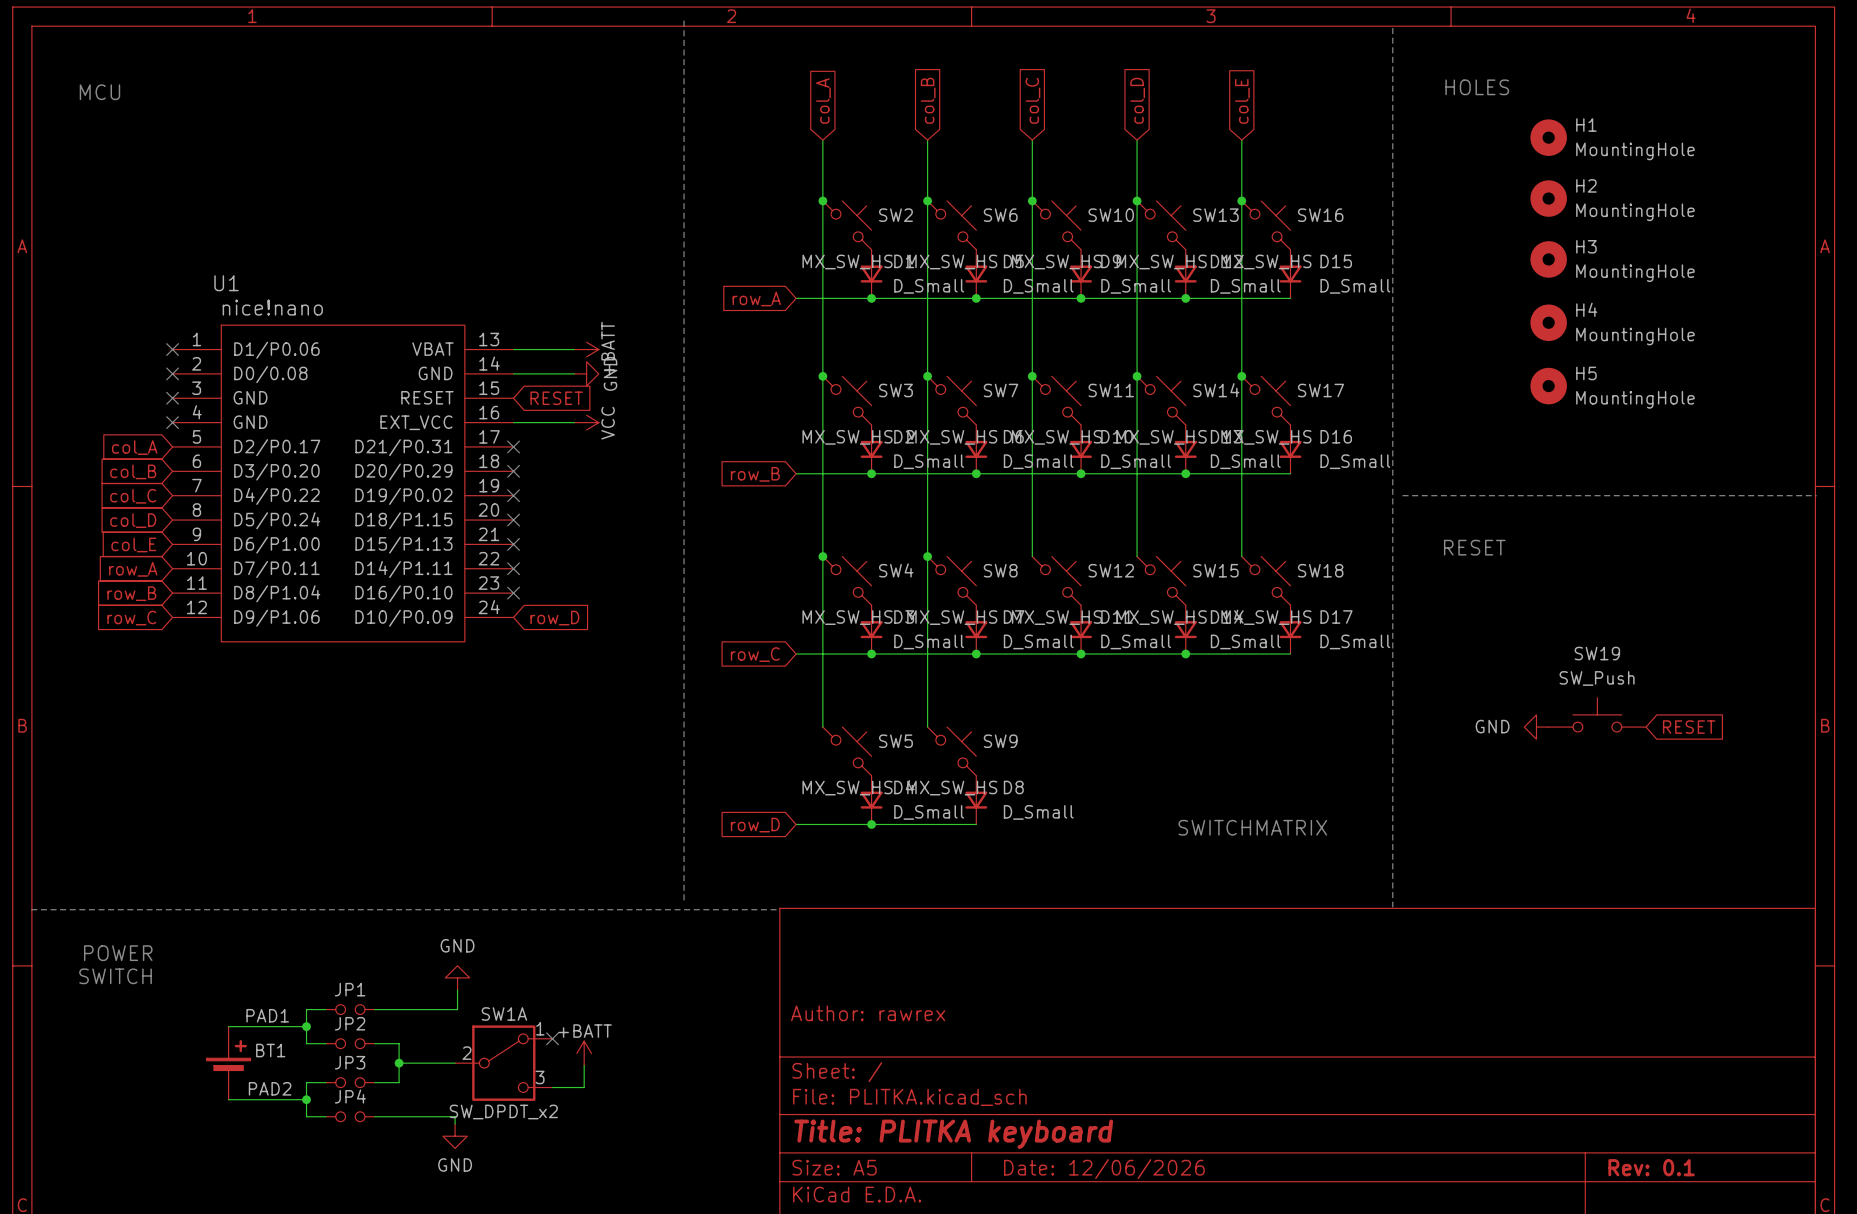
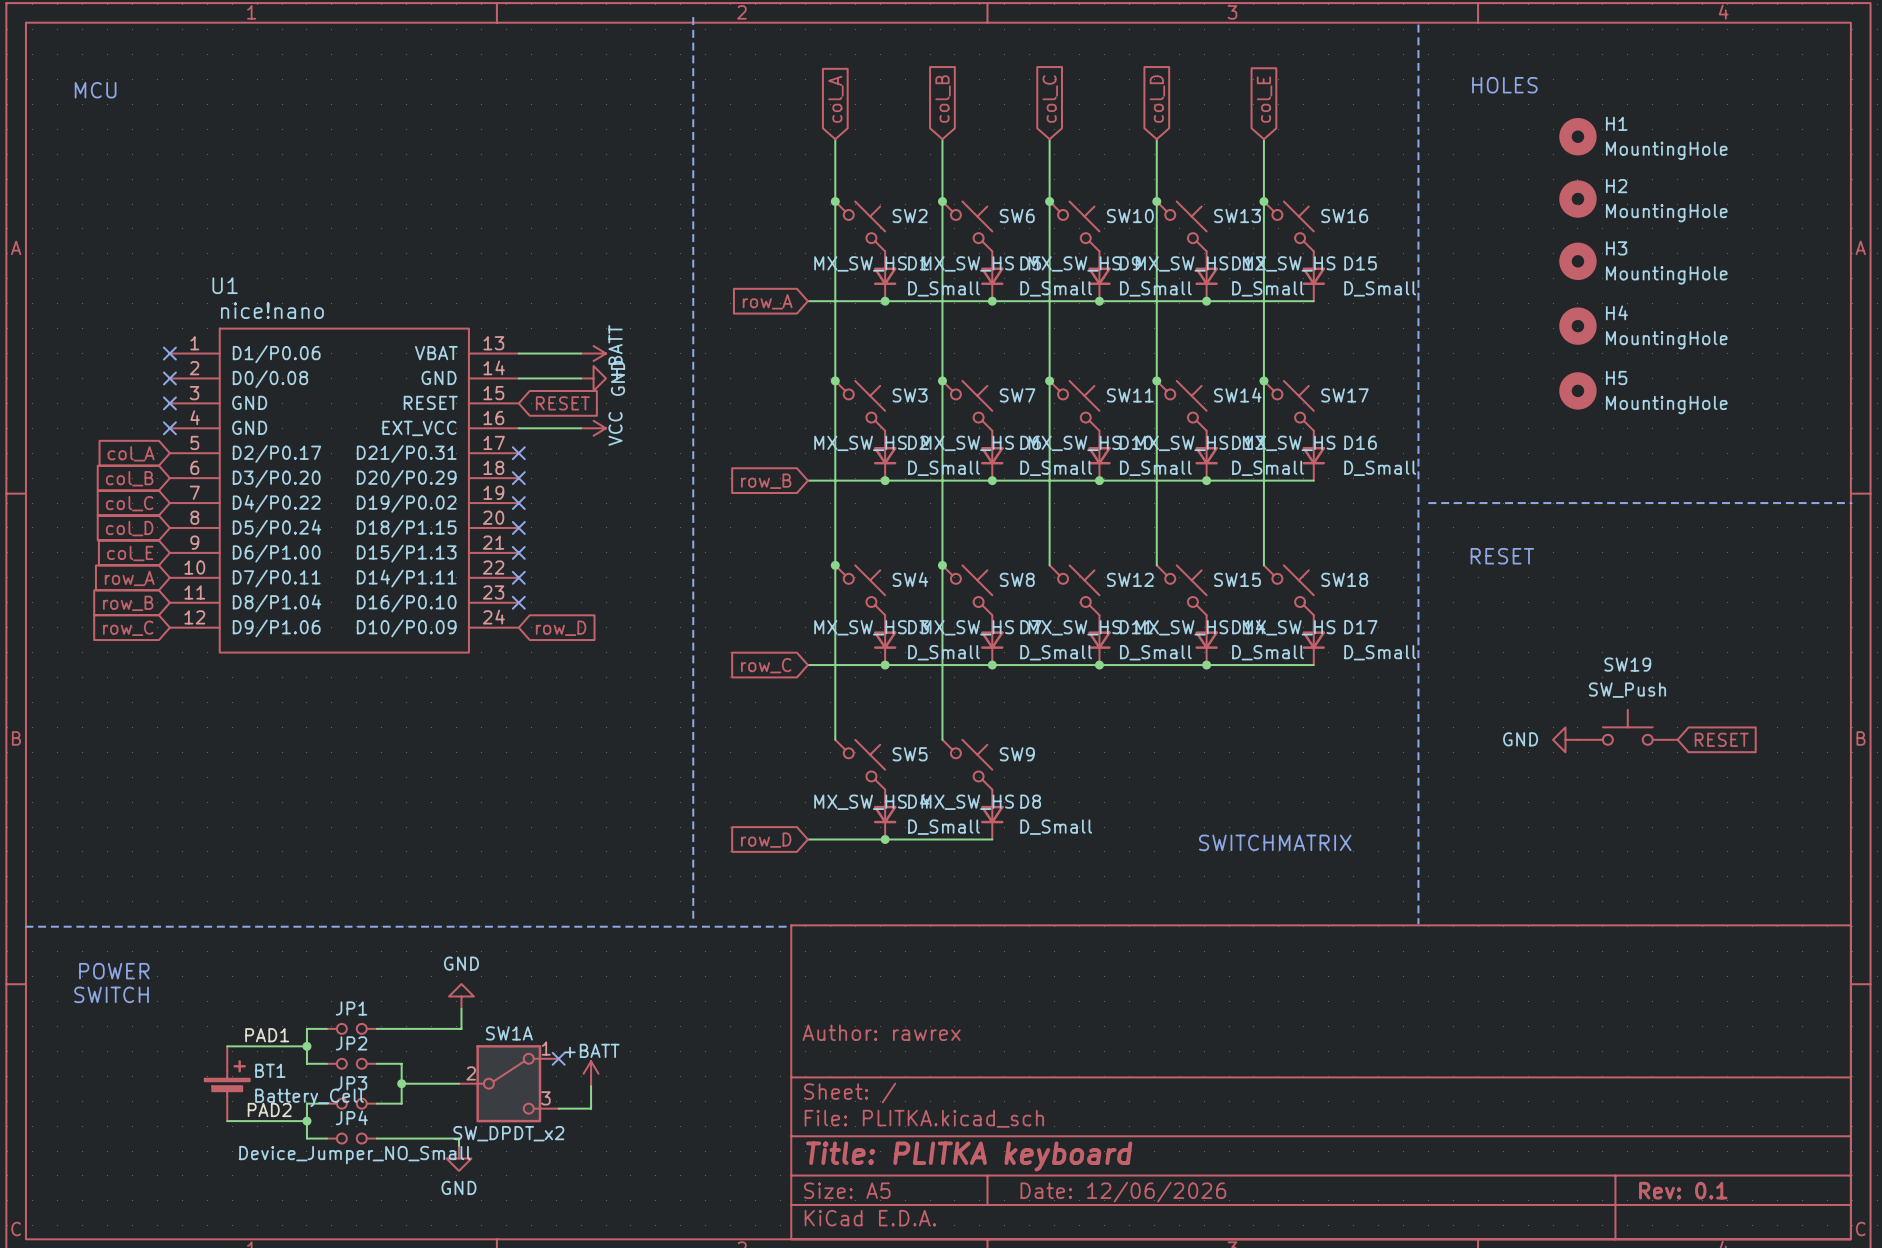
BT1 value: none -> Battery_Cell (309, 1097)
JP4 value: none -> Device_Jumper_NO_Small (354, 1155)

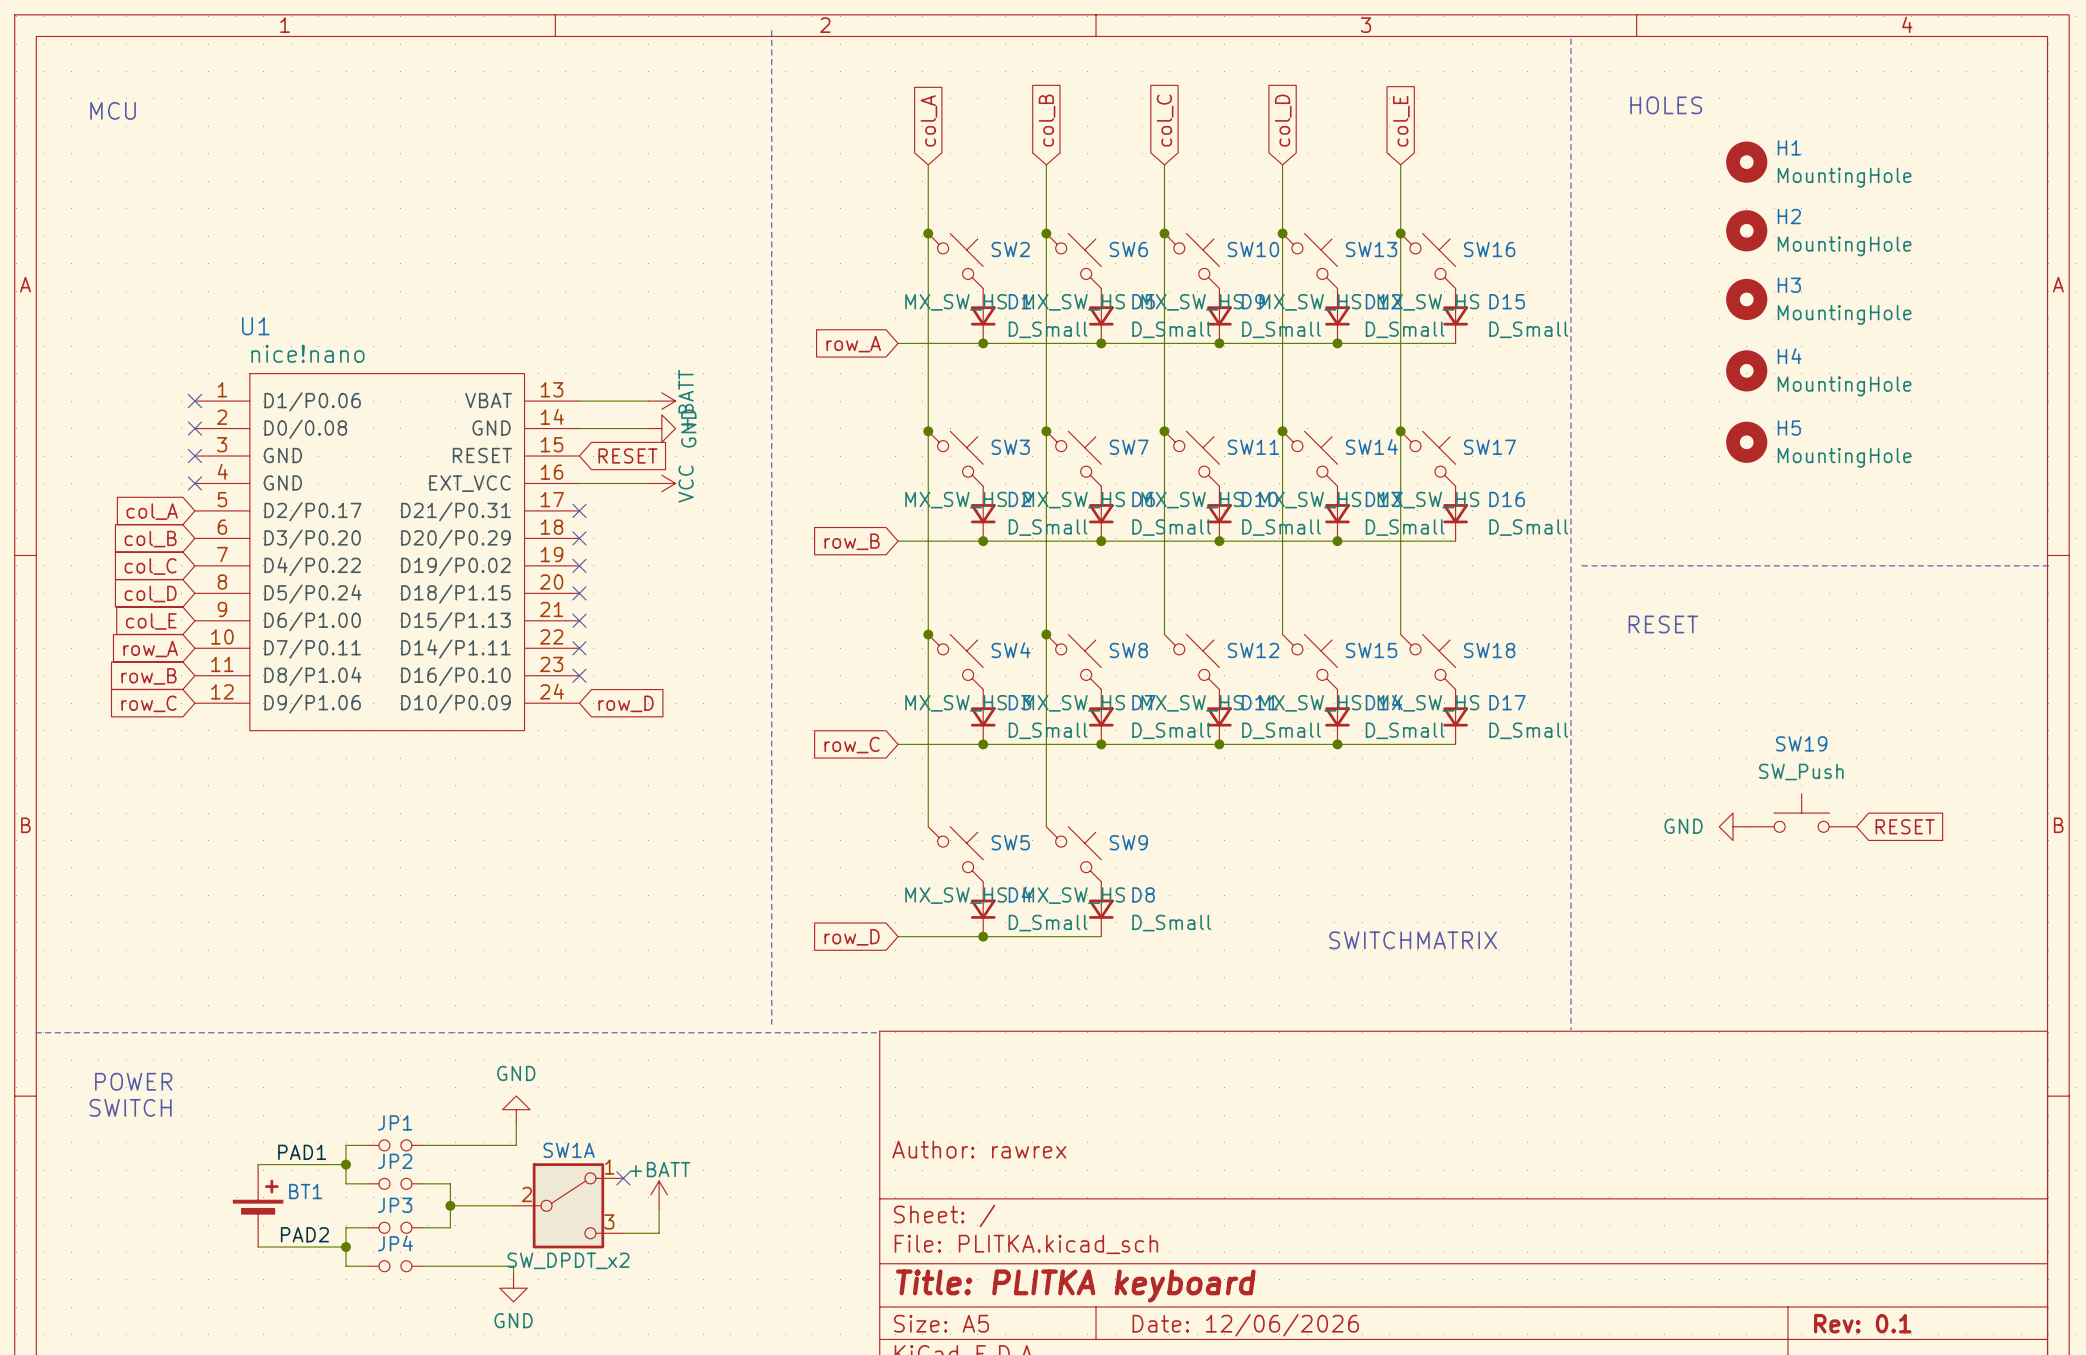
BT1 value: Battery_Cell (309, 1097) -> none
JP4 value: Device_Jumper_NO_Small (354, 1155) -> none

